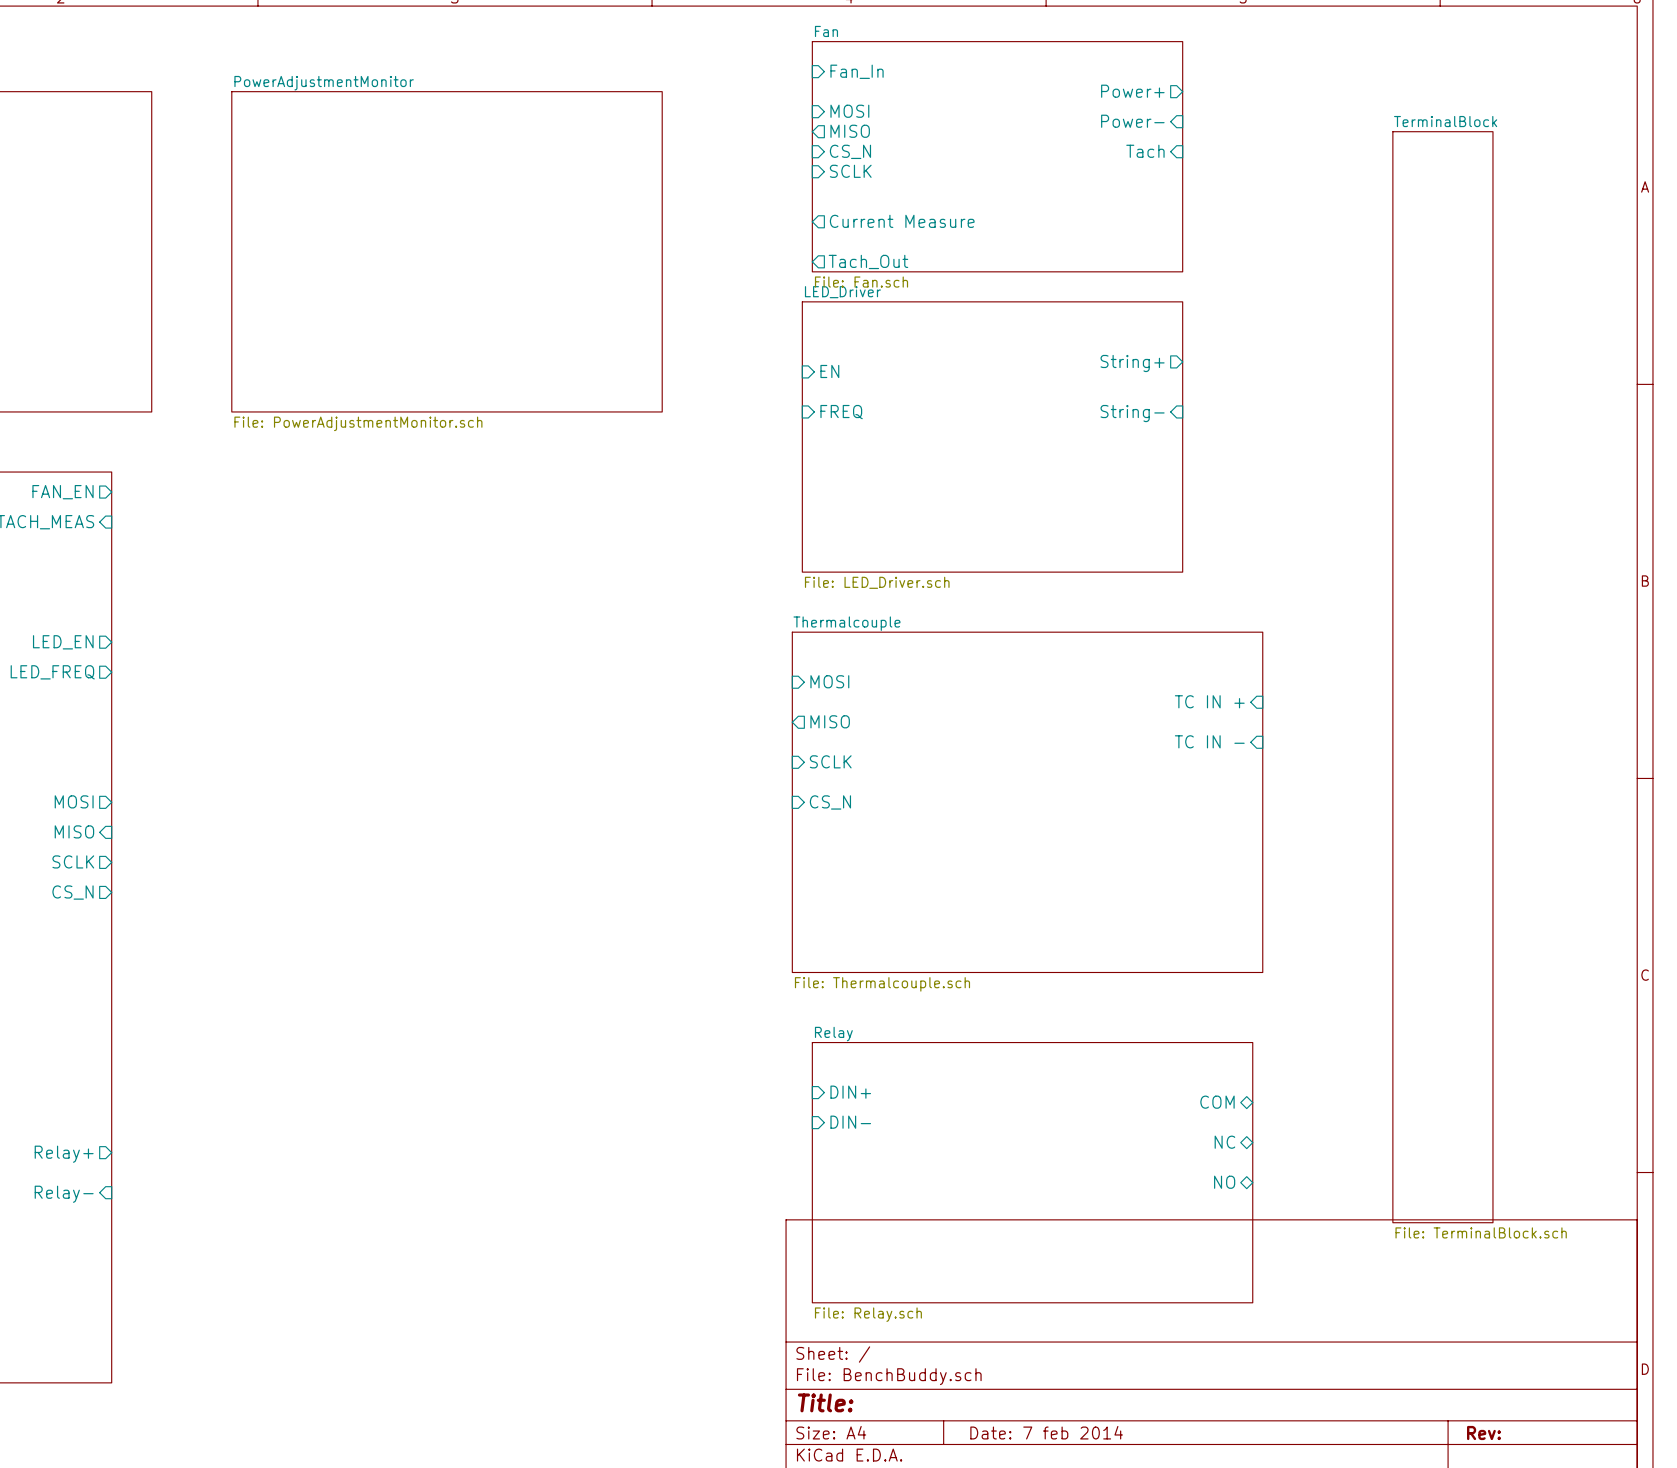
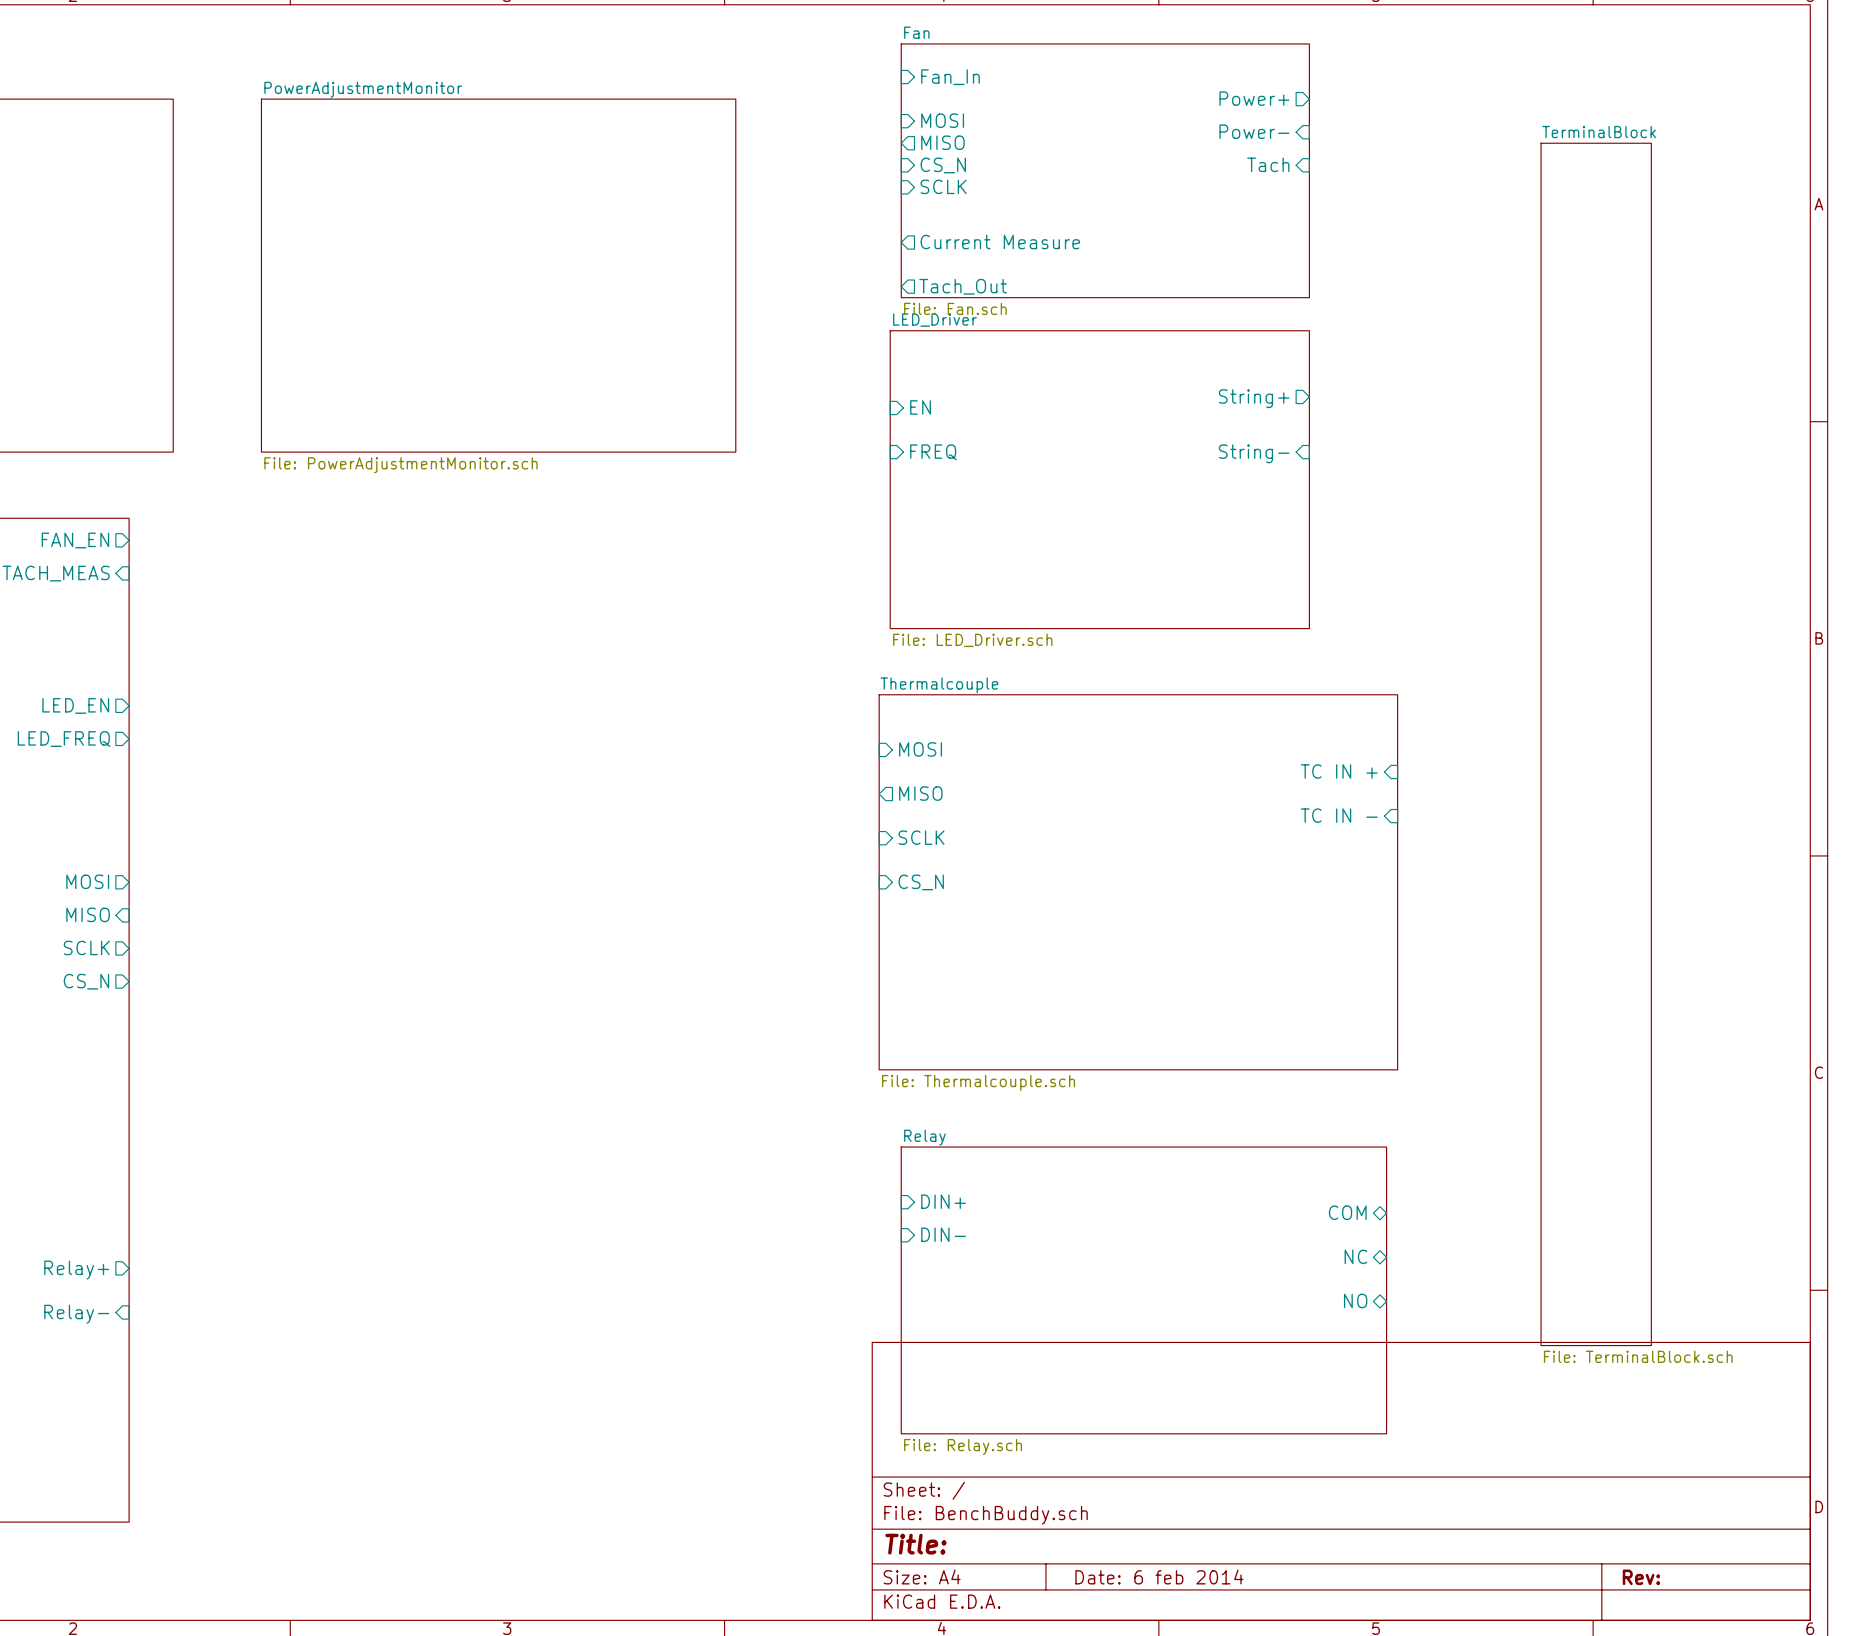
title block: Date: 7 feb 2014 (1046, 1432) -> Date: 6 feb 2014 (1159, 1577)

